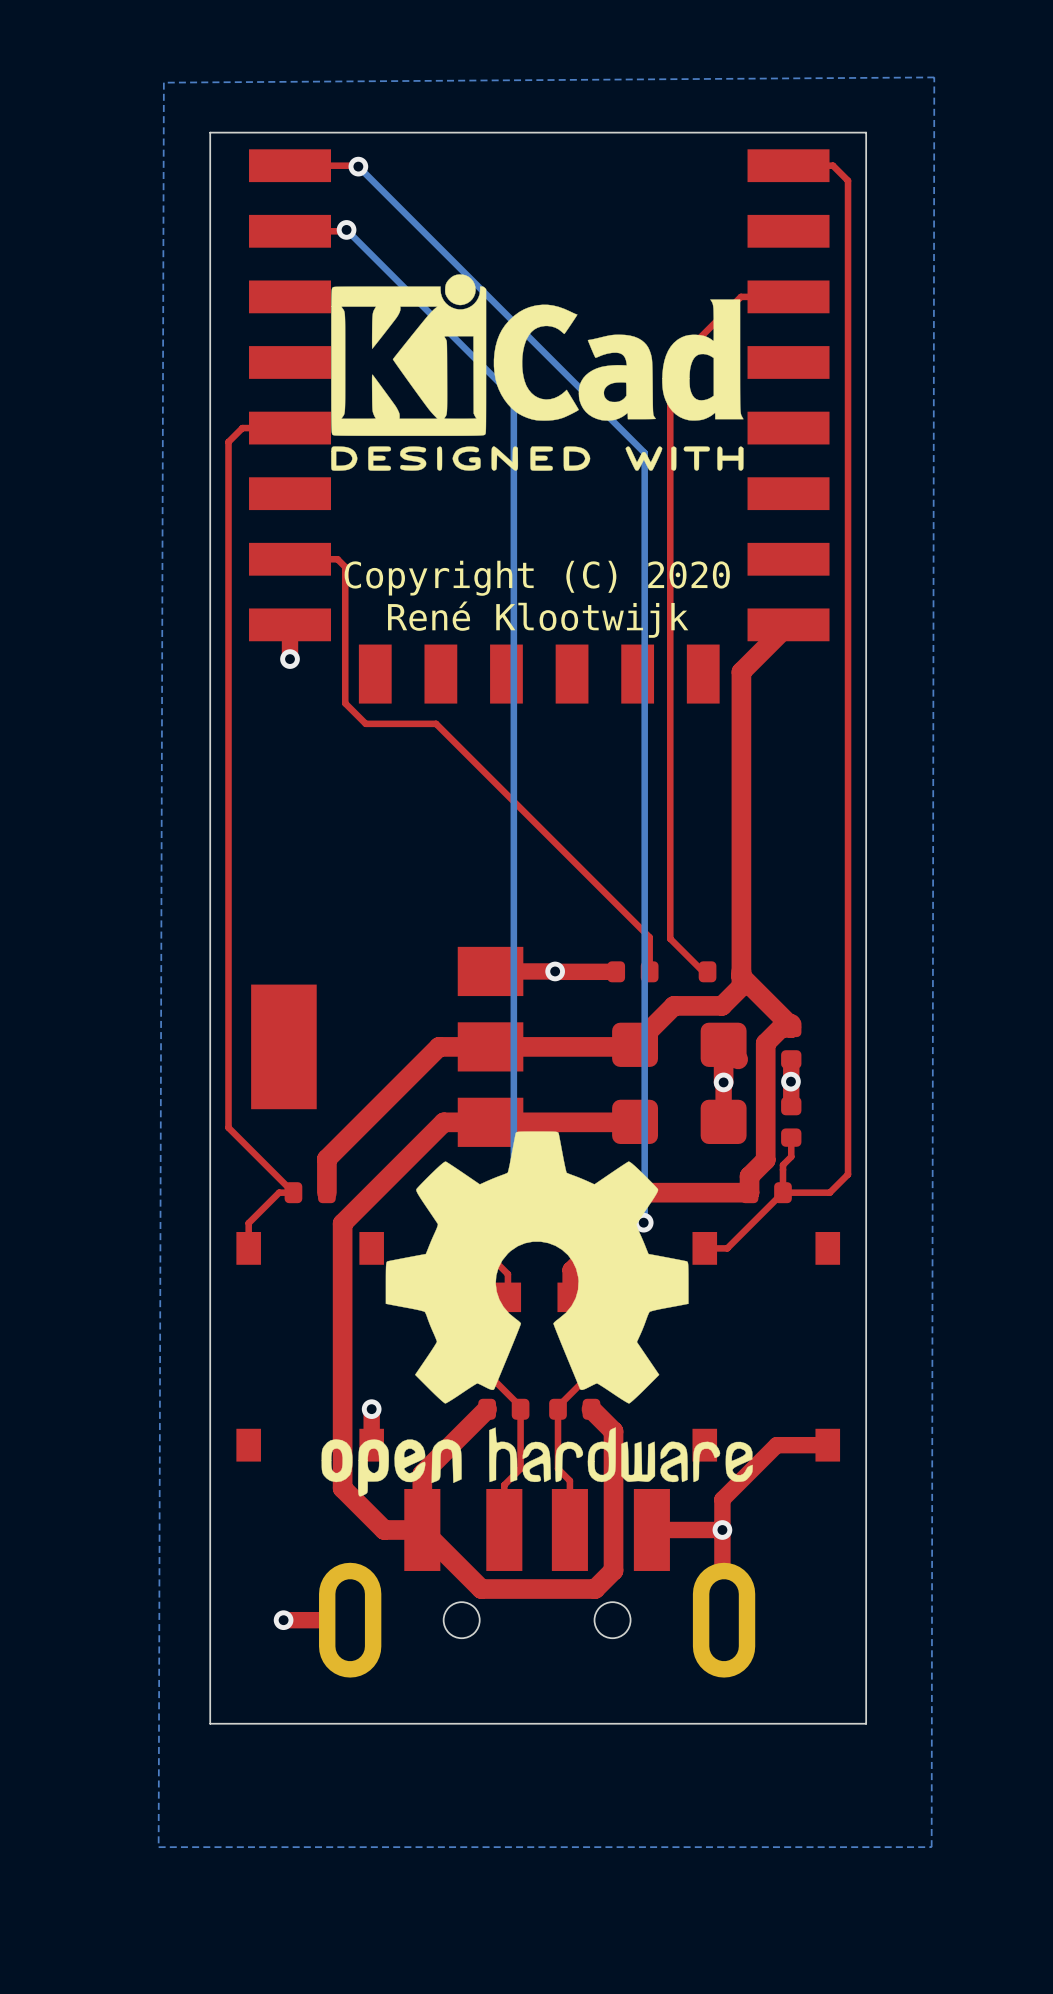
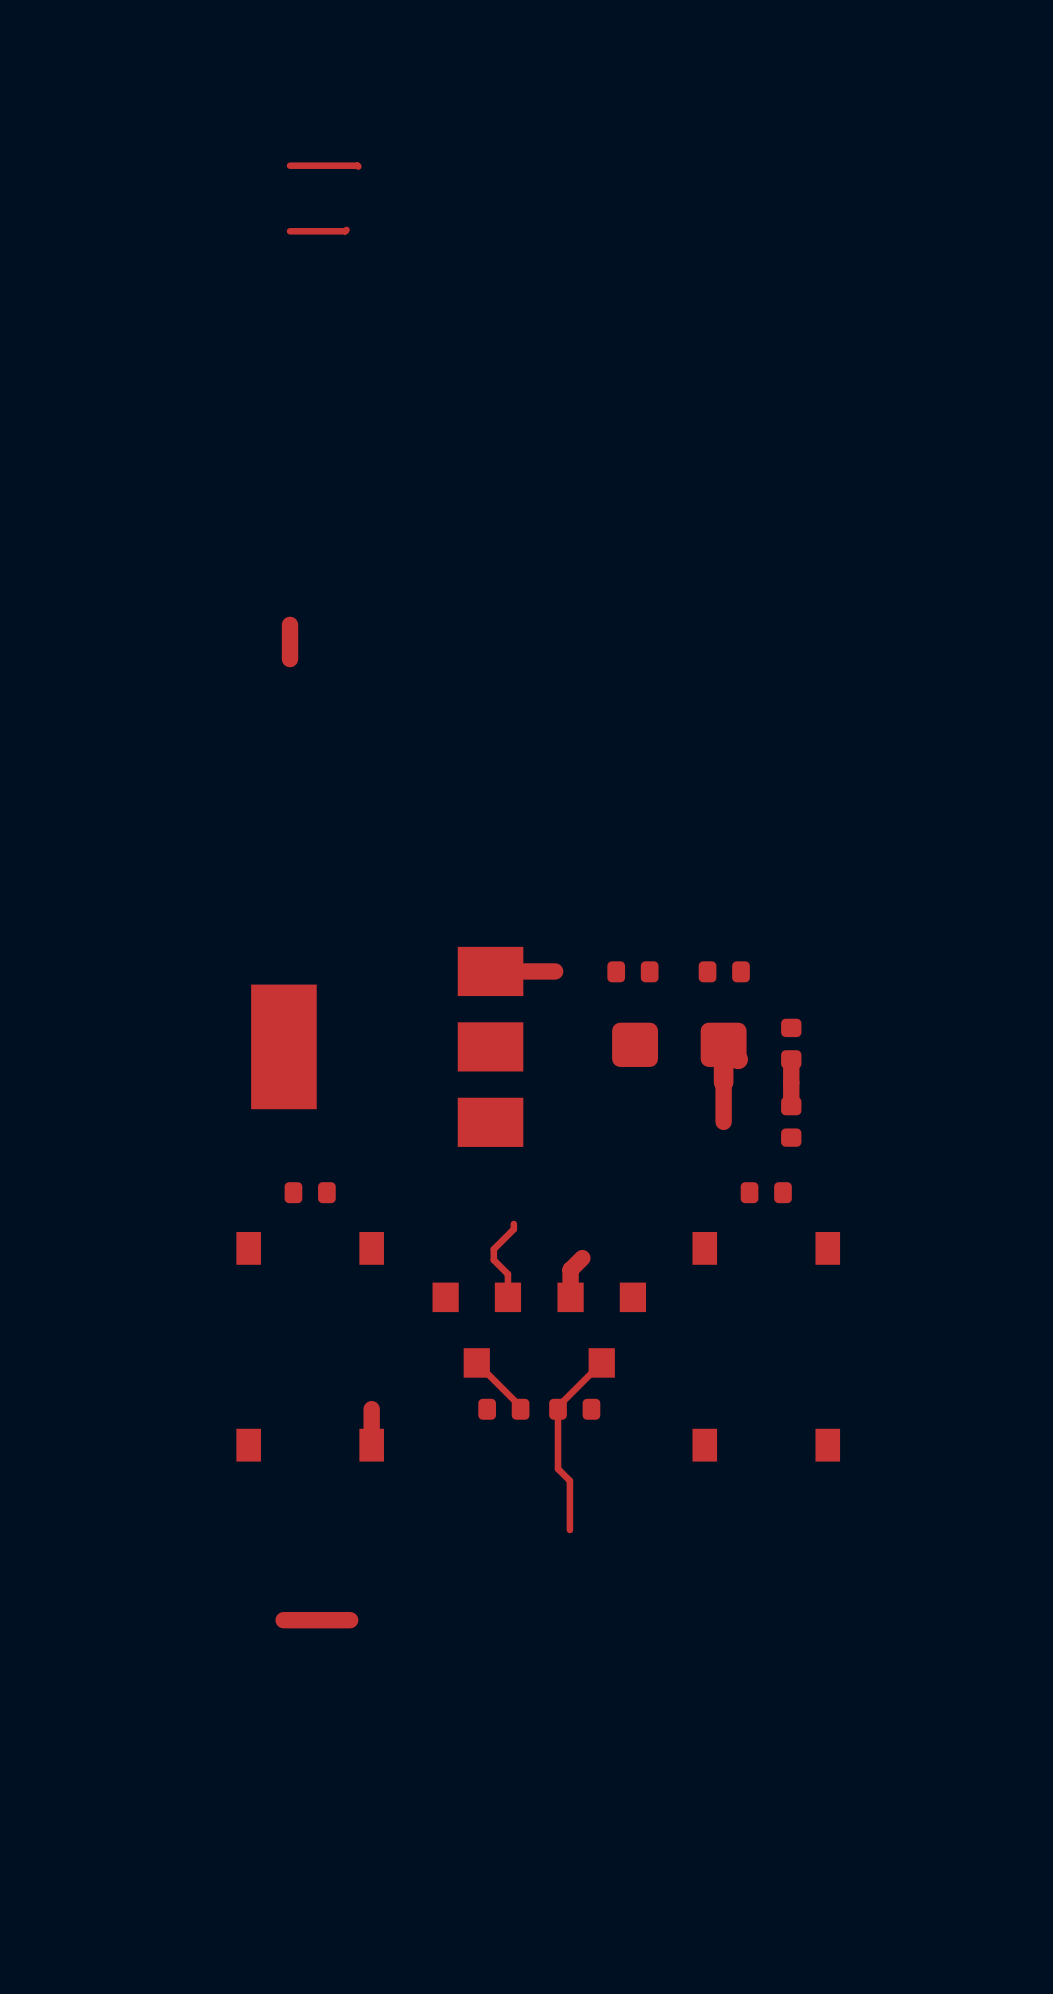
bottom zone outline: (934, 77) (931, 1847) (158, 1847) (163, 82) (934, 77) -> none
board edge: (866, 132) (866, 1723) (210, 1723) (210, 132) (866, 132) -> none
top track: (788, 165) (833, 165) (848, 180) (848, 1174) (829, 1192) (782, 1192) -> none
bottom track: (358, 166) (644, 452) (643, 1222) -> none
via: (358, 166) -> none
bottom track: (346, 229) (513, 397) (513, 1224) -> none
via: (346, 229) -> none
drawing: [331, 274, 744, 471] -> none
top track: (788, 296) (740, 296) (670, 367) (670, 938) (707, 976) -> none
part: (539, 426) -> none
top track: (272, 428) (290, 428) (242, 428) (228, 442) (228, 1127) (293, 1192) (279, 1192) (248, 1223) (248, 1248) -> none
top track: (290, 559) (337, 559) (345, 566) (345, 703) (365, 723) (436, 723) (649, 937) (649, 976) -> none
text: Copyright (C) 2020 (537, 578) -> none
text: René Klootwijk (538, 619) -> none
top track: (788, 624) (741, 671) (741, 981) -> none
via: (290, 659) -> none
via: (555, 971) -> none
top track: (616, 971) (555, 971) -> none
top track: (741, 976) (791, 1026) -> none
top track: (741, 986) (722, 1005) (673, 1005) (632, 1046) (439, 1046) (326, 1159) (326, 1191) -> none
top track: (791, 1023) (791, 1027) (781, 1027) (765, 1043) (765, 1160) (749, 1176) (749, 1192) (628, 1192) (582, 1238) (582, 1249) -> none
via: (790, 1081) -> none
via: (723, 1082) -> none
part: (679, 1121) -> none
top track: (633, 1122) (443, 1122) (342, 1223) (342, 1488) (384, 1529) (422, 1529) (422, 1474) (487, 1409) -> none
drawing: [321, 1131, 753, 1497] -> none
top track: (791, 1137) (791, 1156) (782, 1165) (782, 1192) -> none
top track: (782, 1192) (727, 1248) (704, 1248) -> none
via: (643, 1222) -> none
top track: (520, 1408) (520, 1468) (504, 1485) (504, 1529) -> none
via: (371, 1409) -> none
top track: (591, 1409) (613, 1431) (613, 1570) (595, 1589) (481, 1589) (418, 1526) -> none
top track: (827, 1445) (776, 1445) (722, 1499) (722, 1618) (724, 1620) -> none
top track: (722, 1529) (651, 1529) -> none
via: (722, 1529) -> none
part: (537, 1583) -> none
via: (283, 1620) -> none

